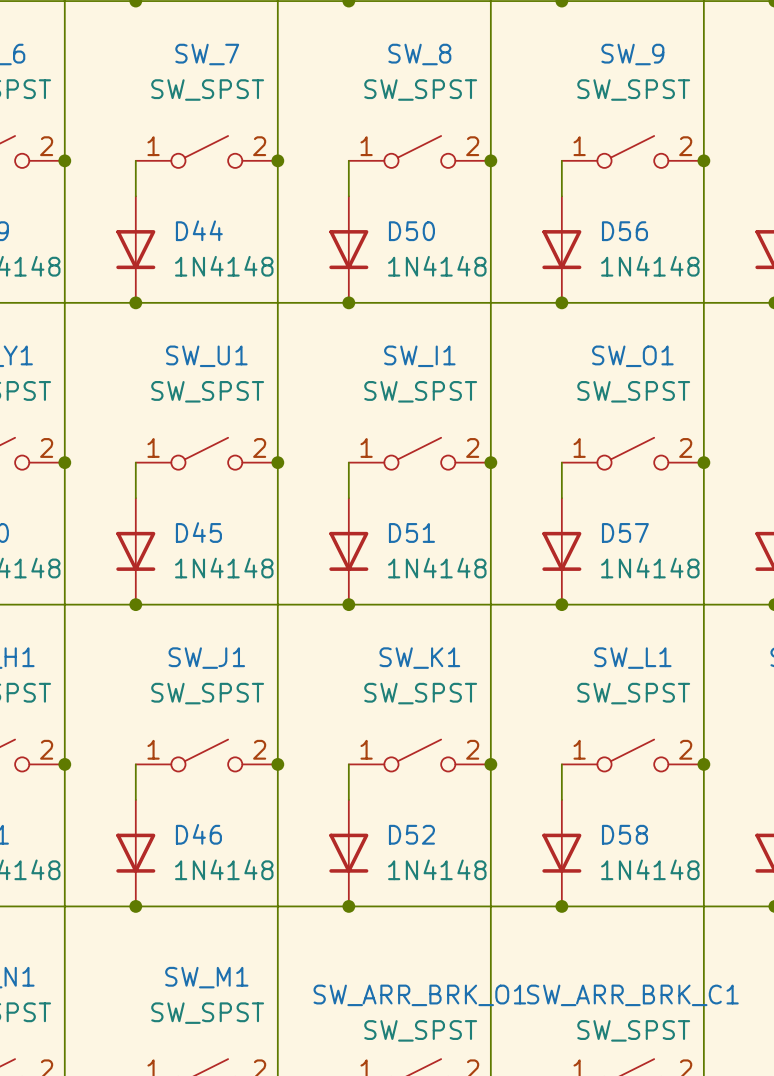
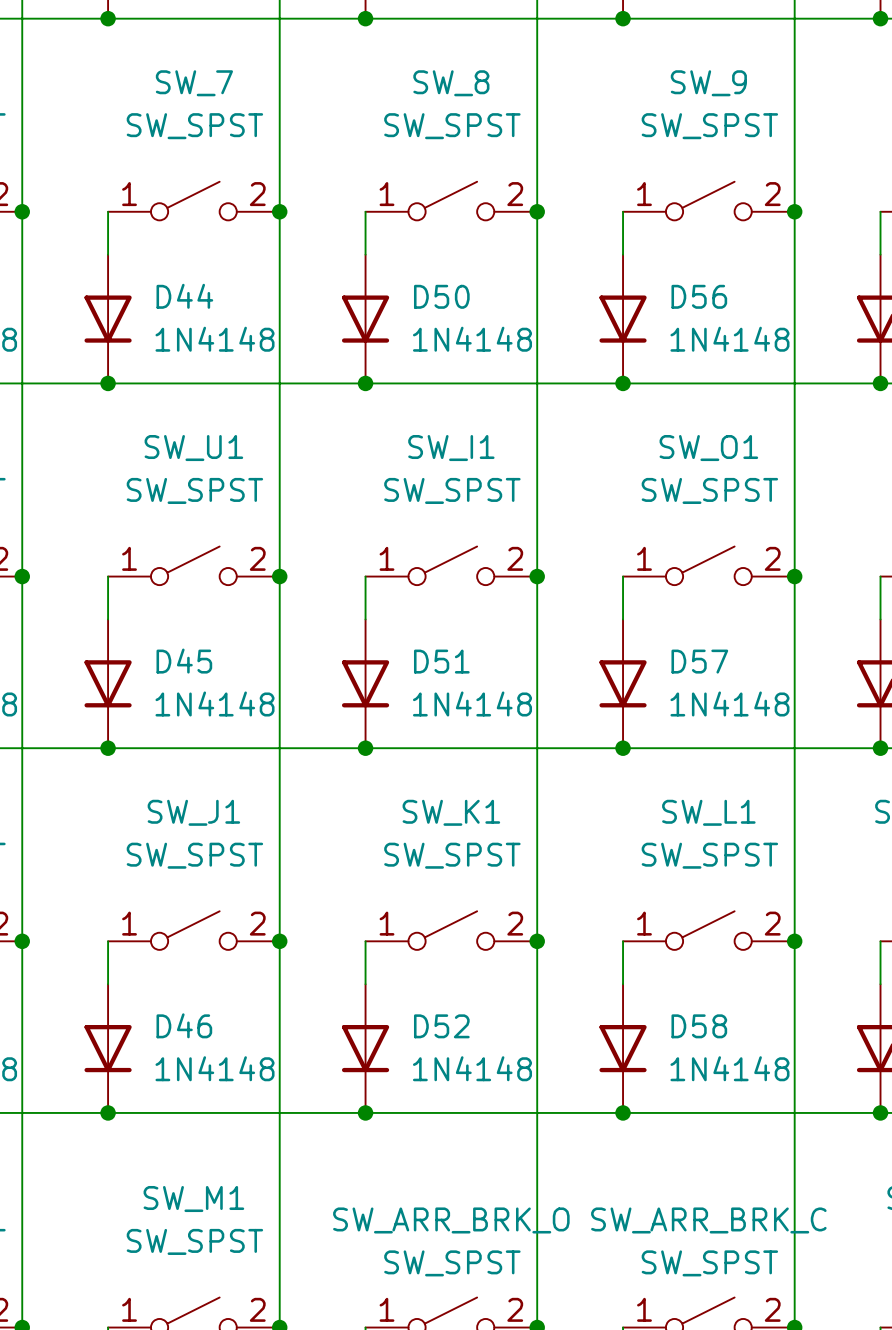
SW_ARR_BRK_O1 name: SW_ARR_BRK_O1 (419, 995) -> SW_ARR_BRK_O (451, 1220)
SW_ARR_BRK_C1 name: SW_ARR_BRK_C1 (632, 995) -> SW_ARR_BRK_C (708, 1220)

